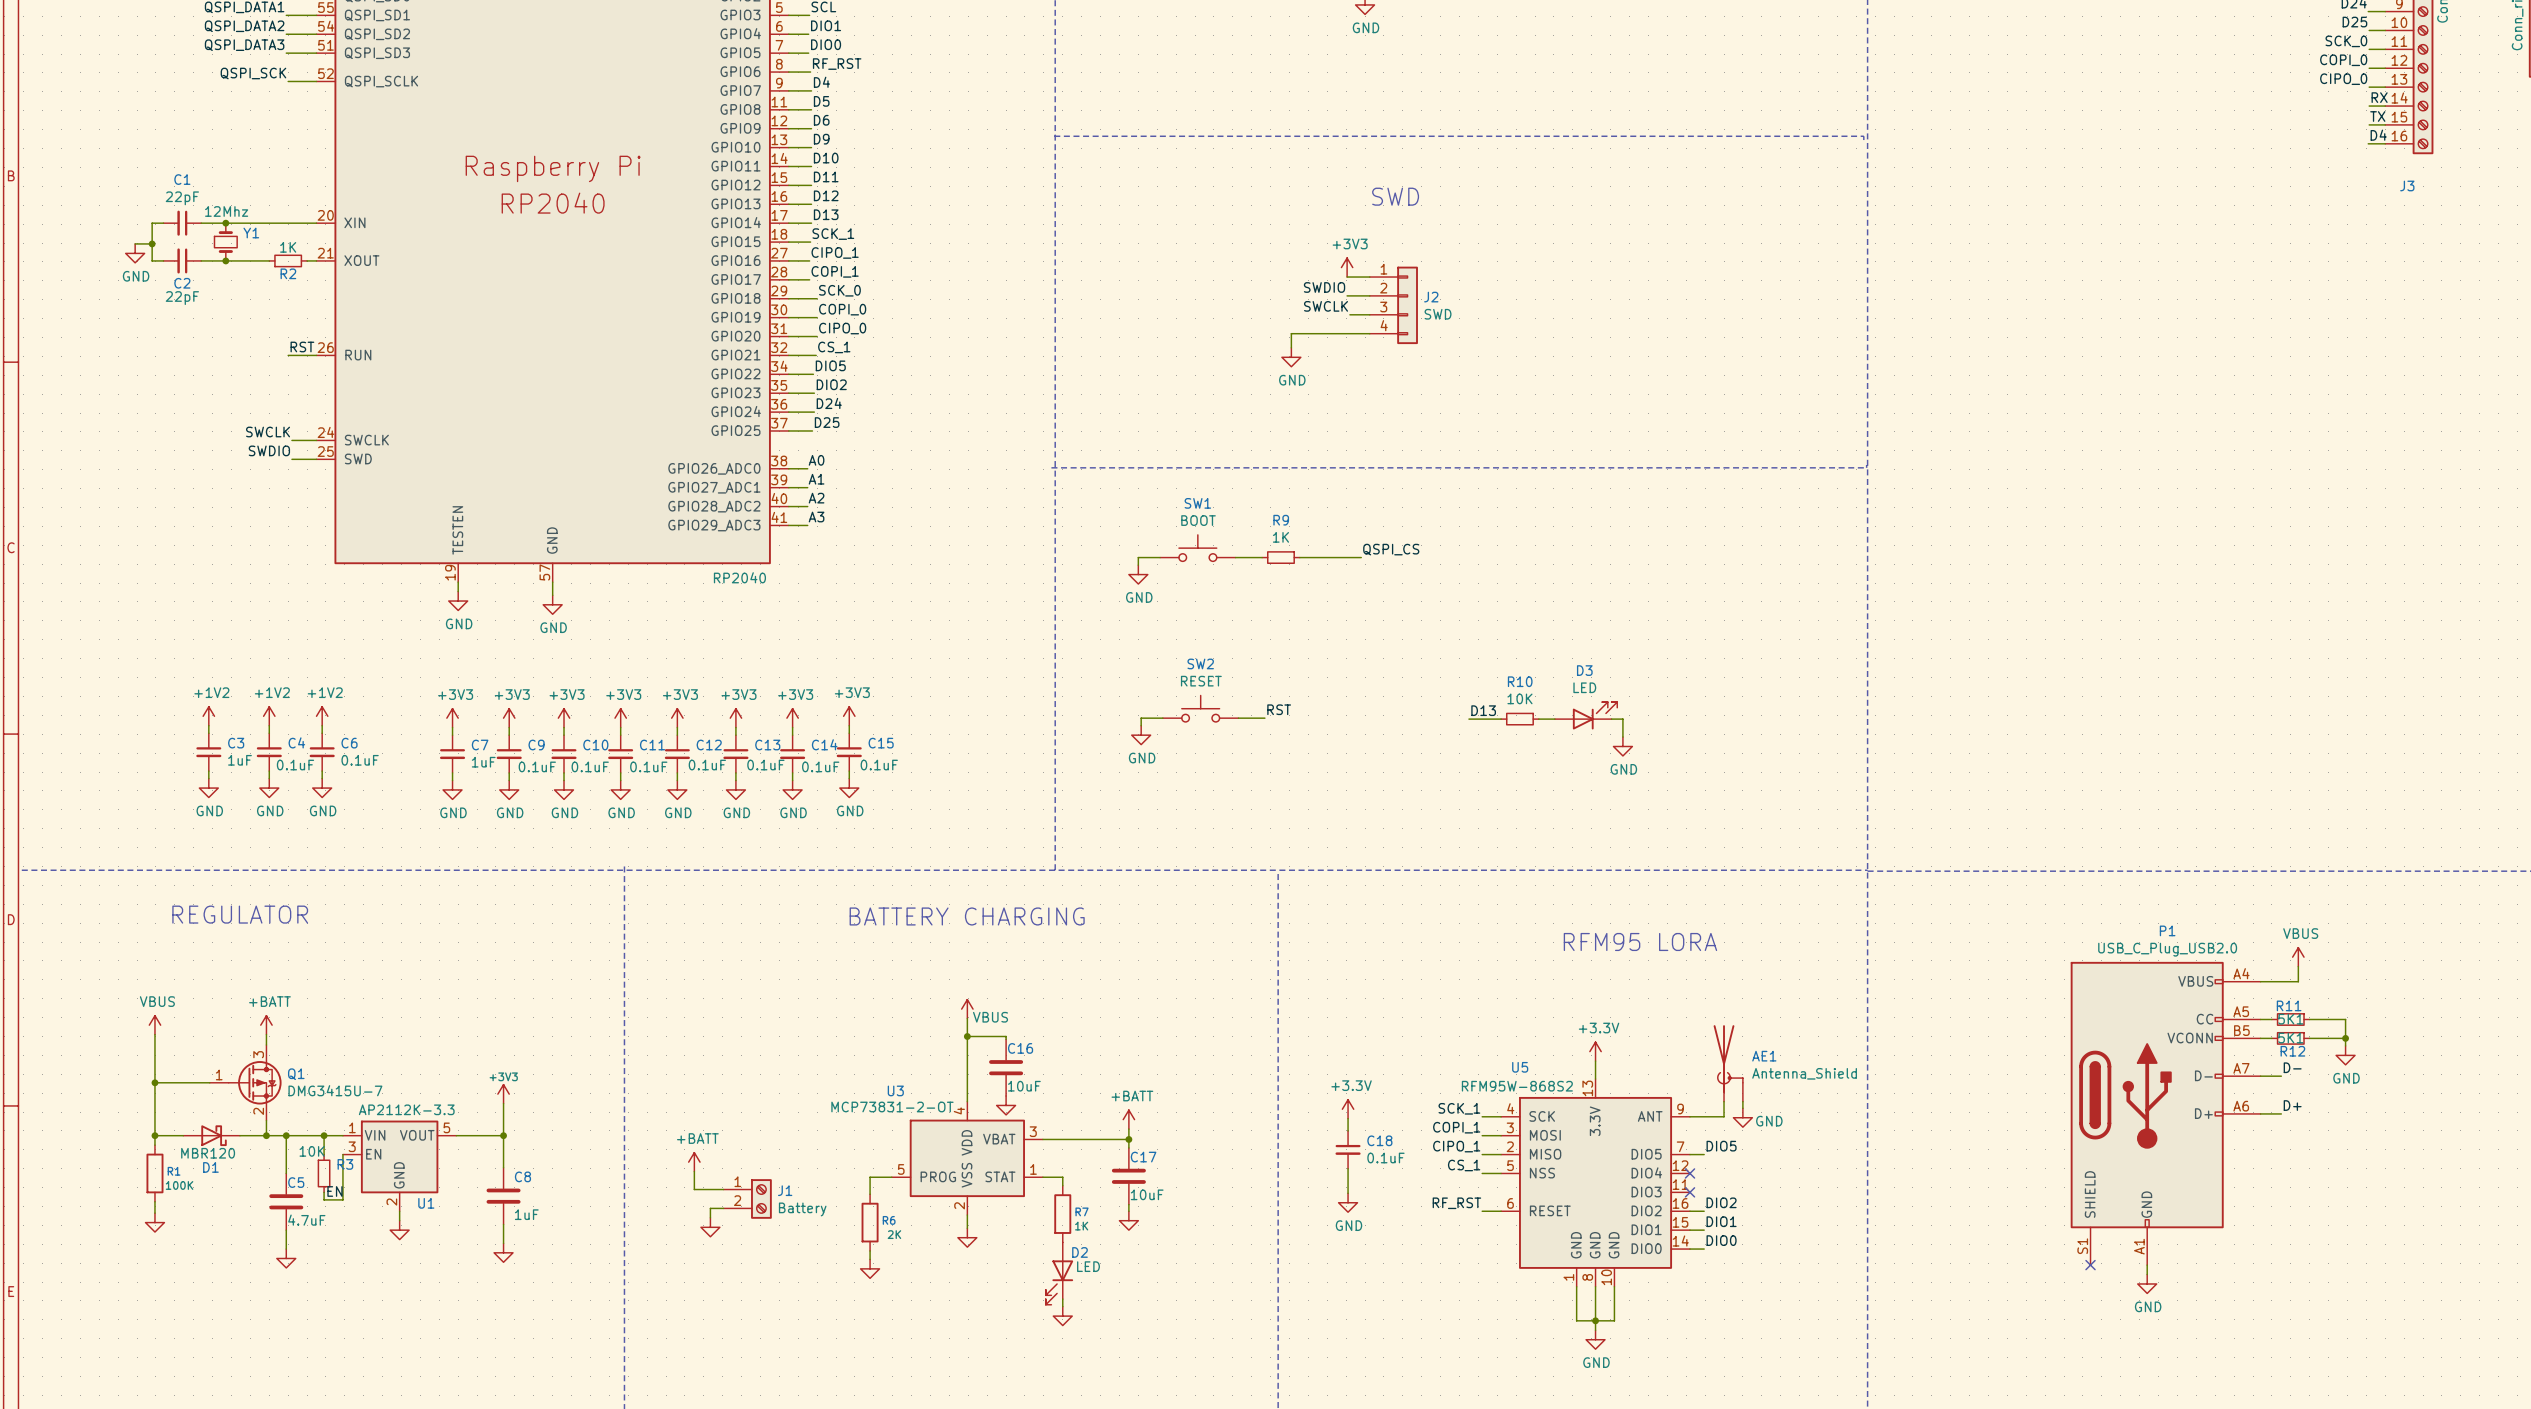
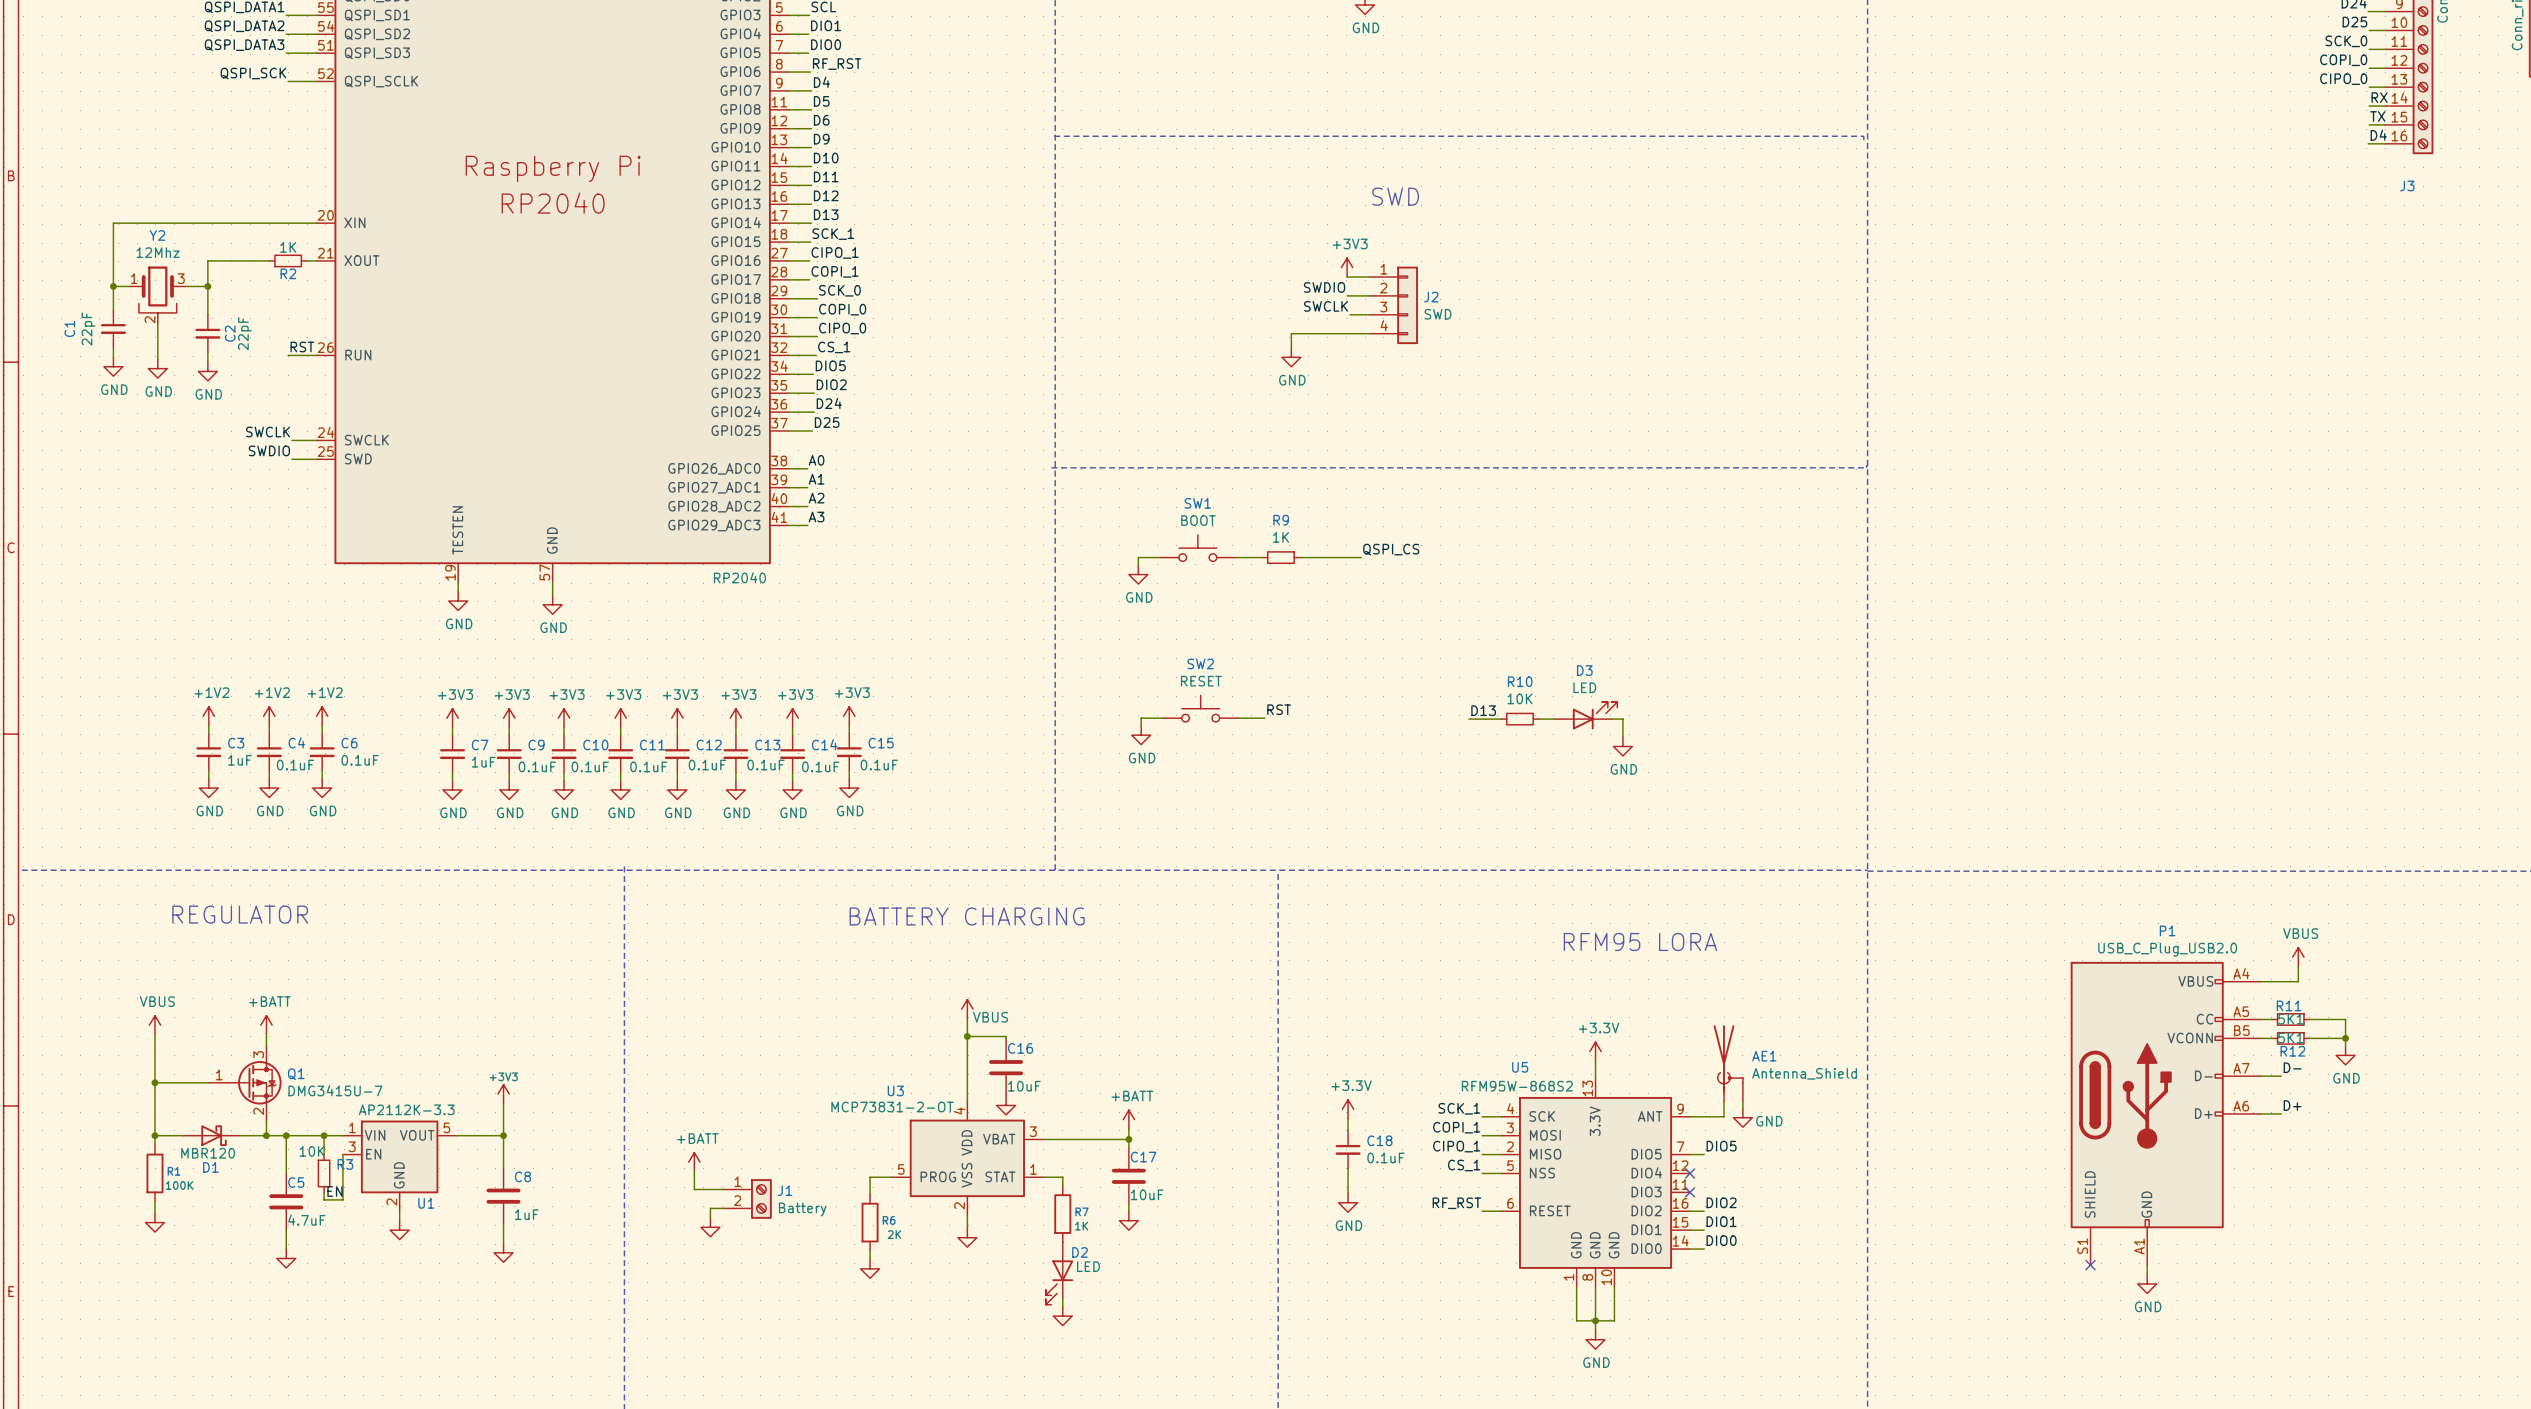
wire: (152, 223) (152, 260) (163, 260) -> (152, 223) (113, 223) (113, 310)
C1 rotation: 0° (182, 223) -> 90° counterclockwise (113, 329)
C1 position: (182, 223) -> (113, 328)
junction: (225, 223) -> none
Y1: 12Mhz (225, 242) -> none
wire: (135, 243) (152, 243) -> none
junction: (152, 243) -> none
power symbol: GND (135, 253) -> none
C2 rotation: 0° (182, 260) -> 90° counterclockwise (207, 333)
C2 position: (182, 260) -> (207, 333)
wire: (201, 260) (207, 260) -> (207, 314) (207, 260)
junction position: (225, 260) -> (207, 286)
wire: none -> (113, 286) (129, 286)
junction: none -> (113, 286)
wire: none -> (186, 286) (207, 286)
Y2: none -> 12Mhz (157, 295)
wire: none -> (157, 324) (157, 359)
wire: none -> (113, 347) (113, 357)
wire: none -> (207, 352) (207, 362)
power symbol: none -> GND (113, 366)
power symbol: none -> GND (157, 368)
power symbol: none -> GND (207, 371)

